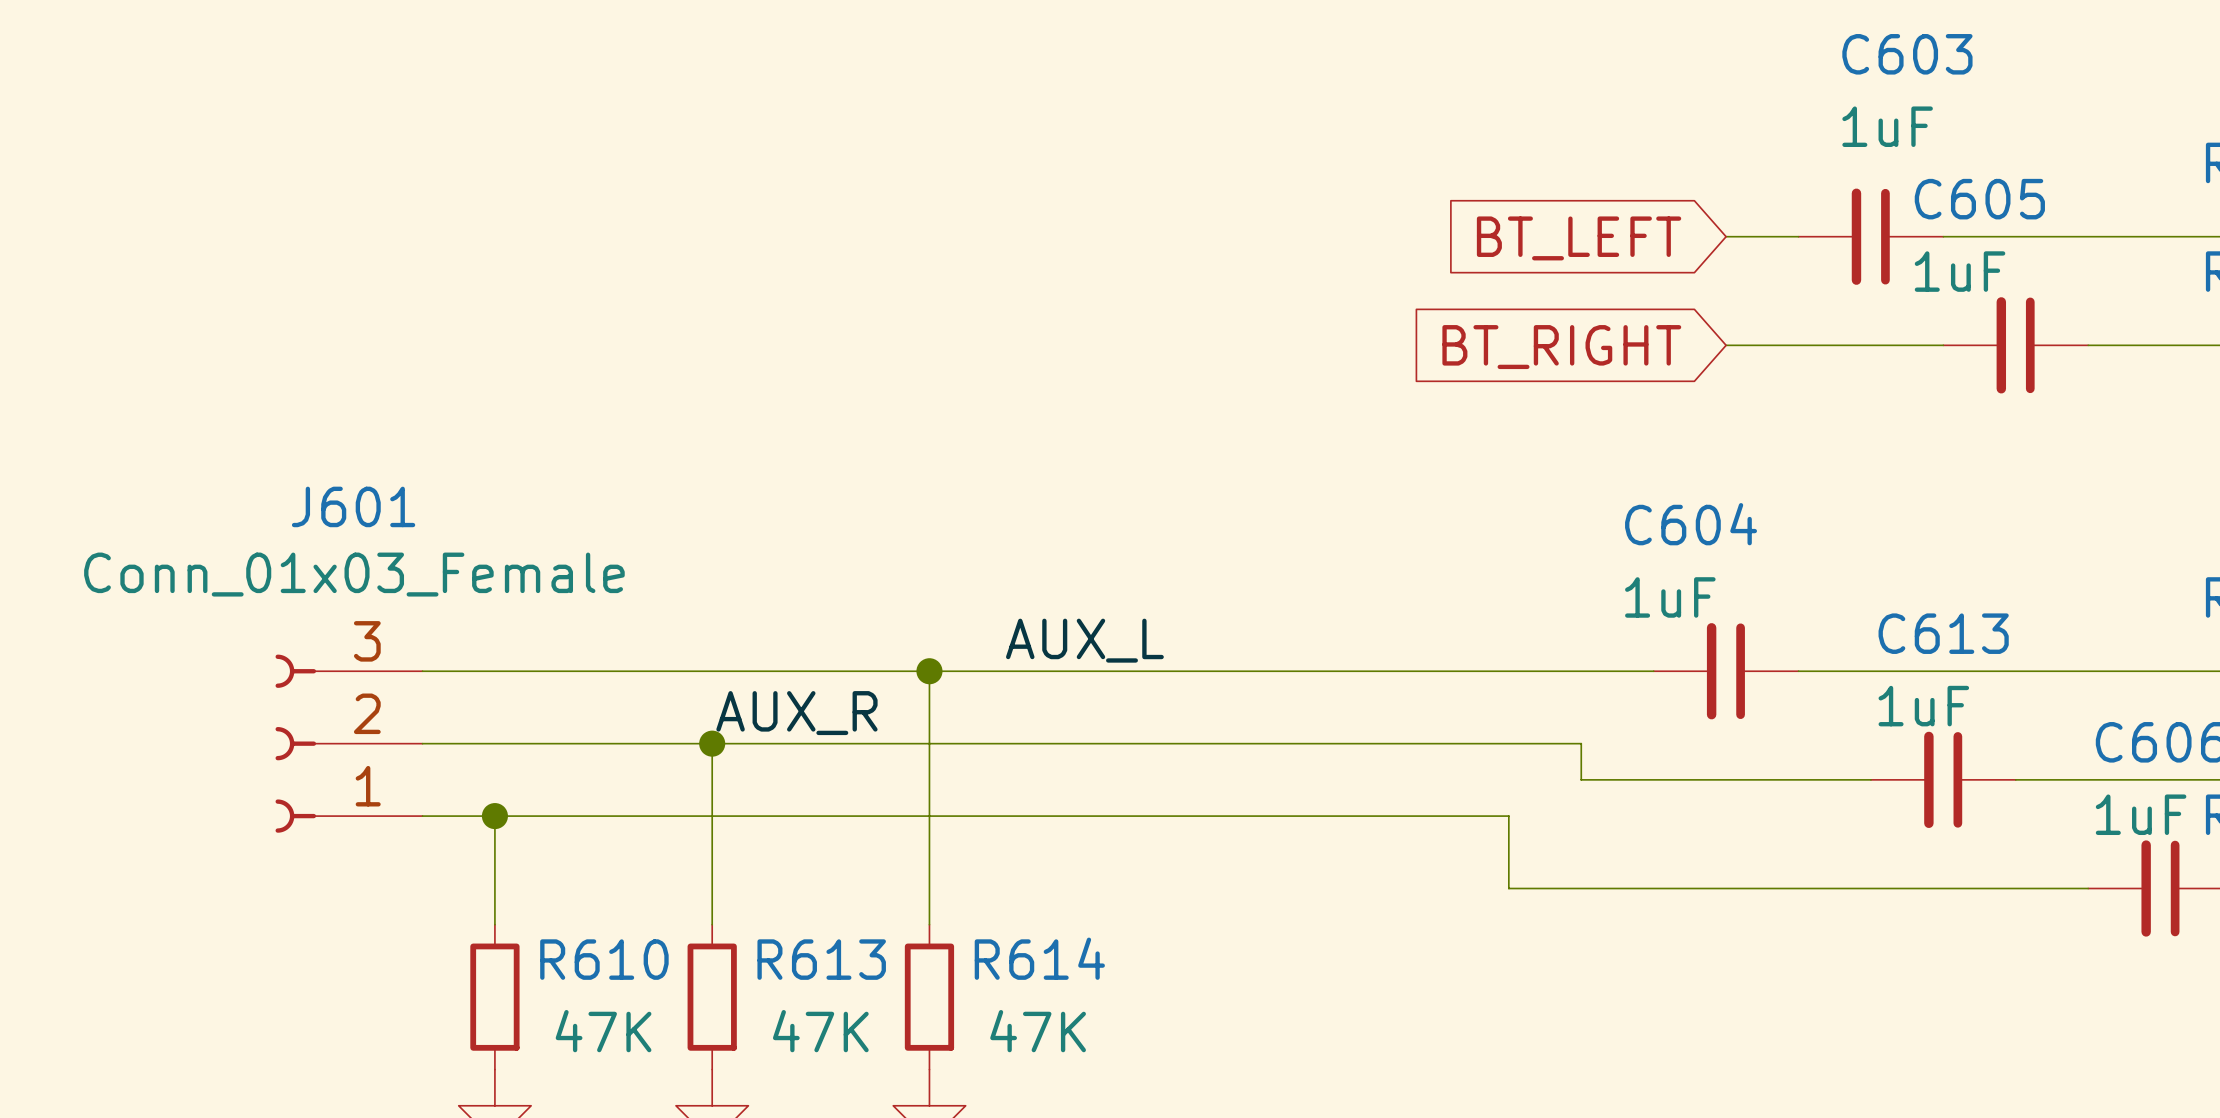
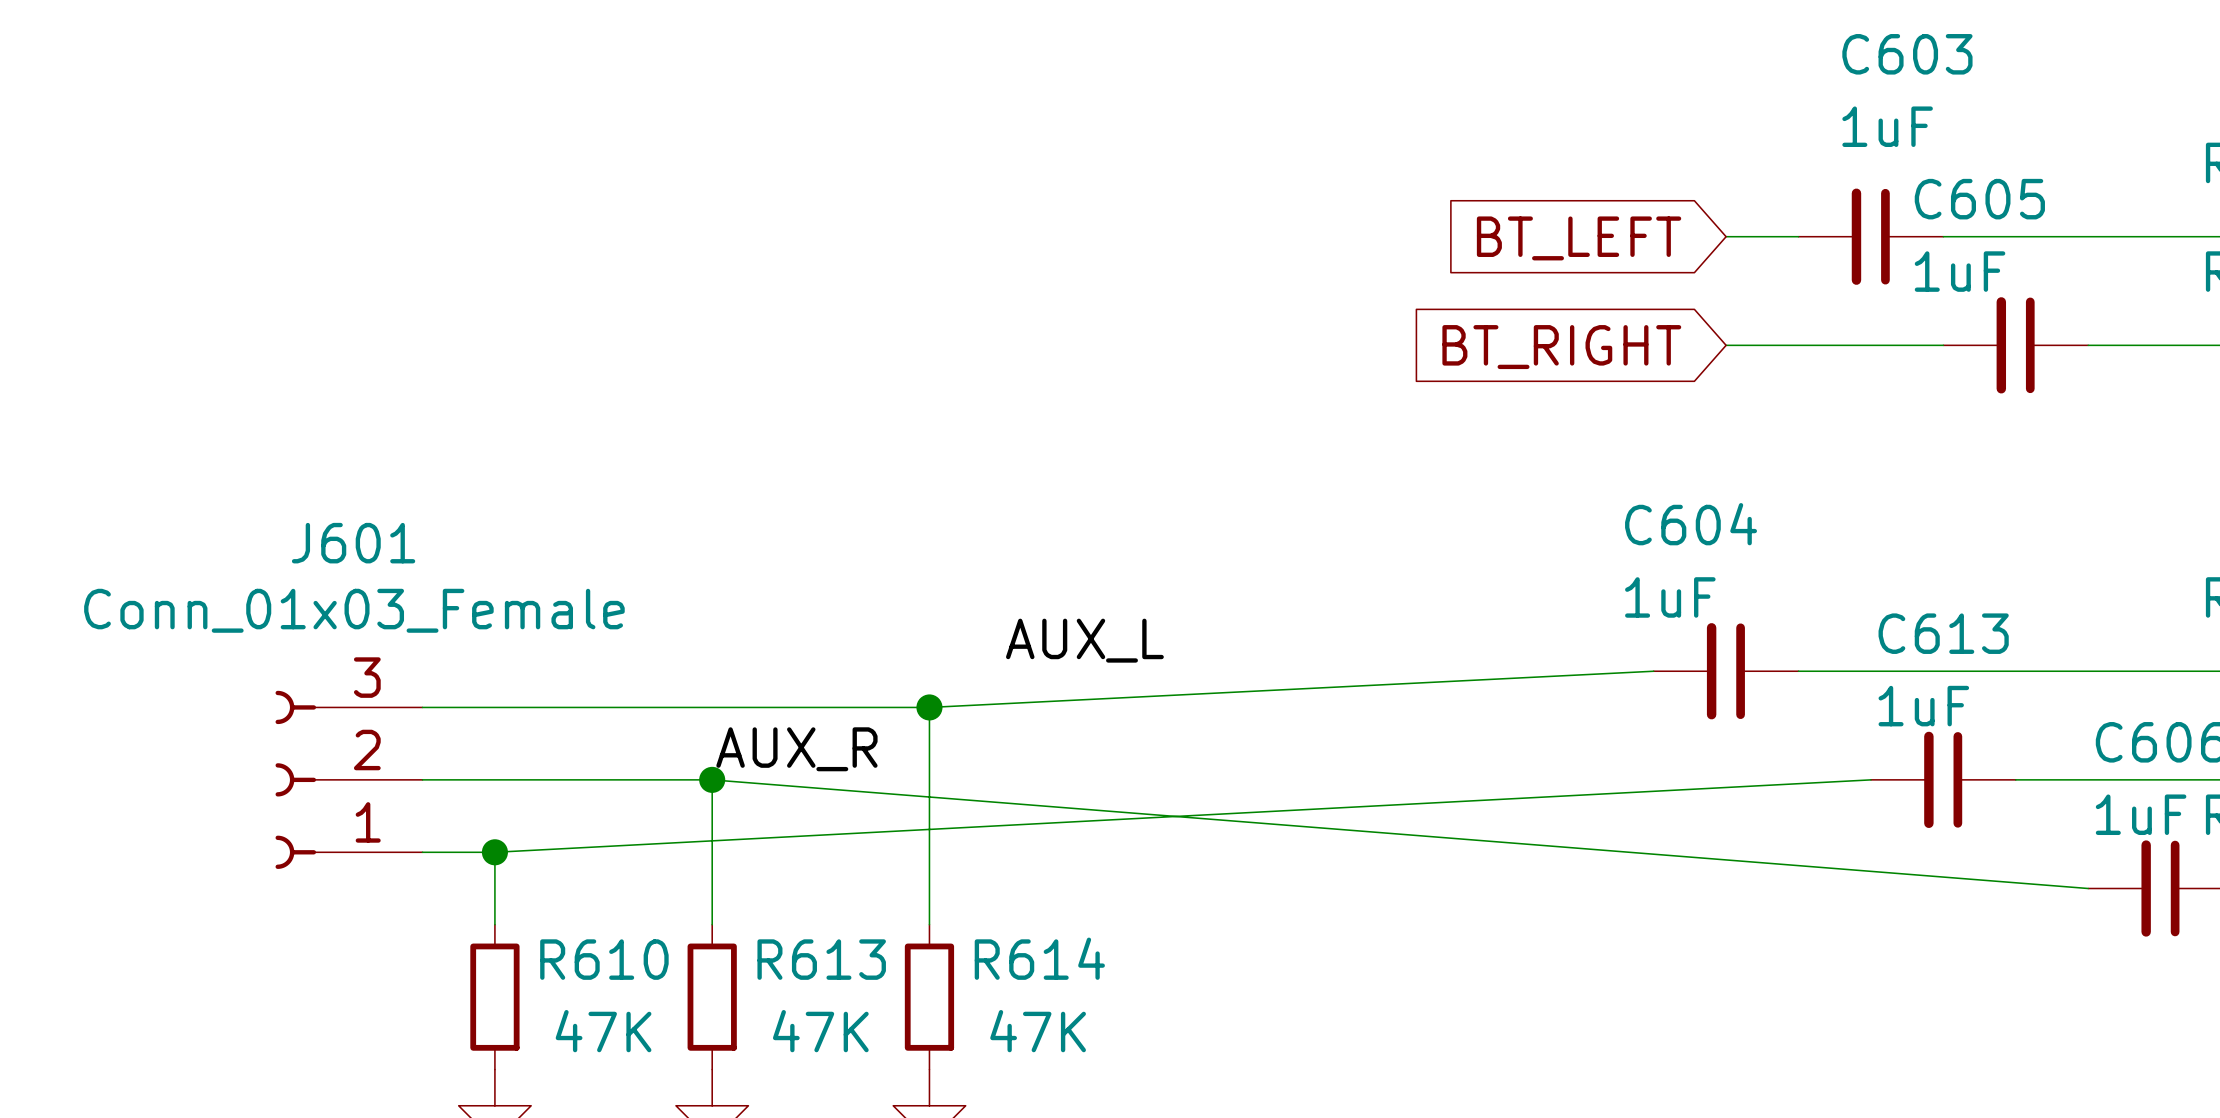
wire: (422, 671) (1653, 671) -> (422, 707) (929, 707) (1653, 671)
wire: (929, 671) (929, 707) -> none
junction position: (929, 671) -> (929, 707)
label position: AUX_R (796, 713) -> AUX_R (796, 749)
J601 position: (349, 743) -> (349, 779)
wire: (422, 743) (1581, 743) (1581, 779) (1870, 779) -> (422, 852) (494, 852) (1870, 779)
wire: (712, 743) (712, 779) -> none
junction position: (712, 743) -> (712, 779)
wire: (422, 816) (1508, 816) (1508, 888) (2088, 888) -> (422, 779) (712, 779) (2088, 888)
wire: (494, 816) (494, 852) -> none
junction position: (494, 816) -> (494, 852)

